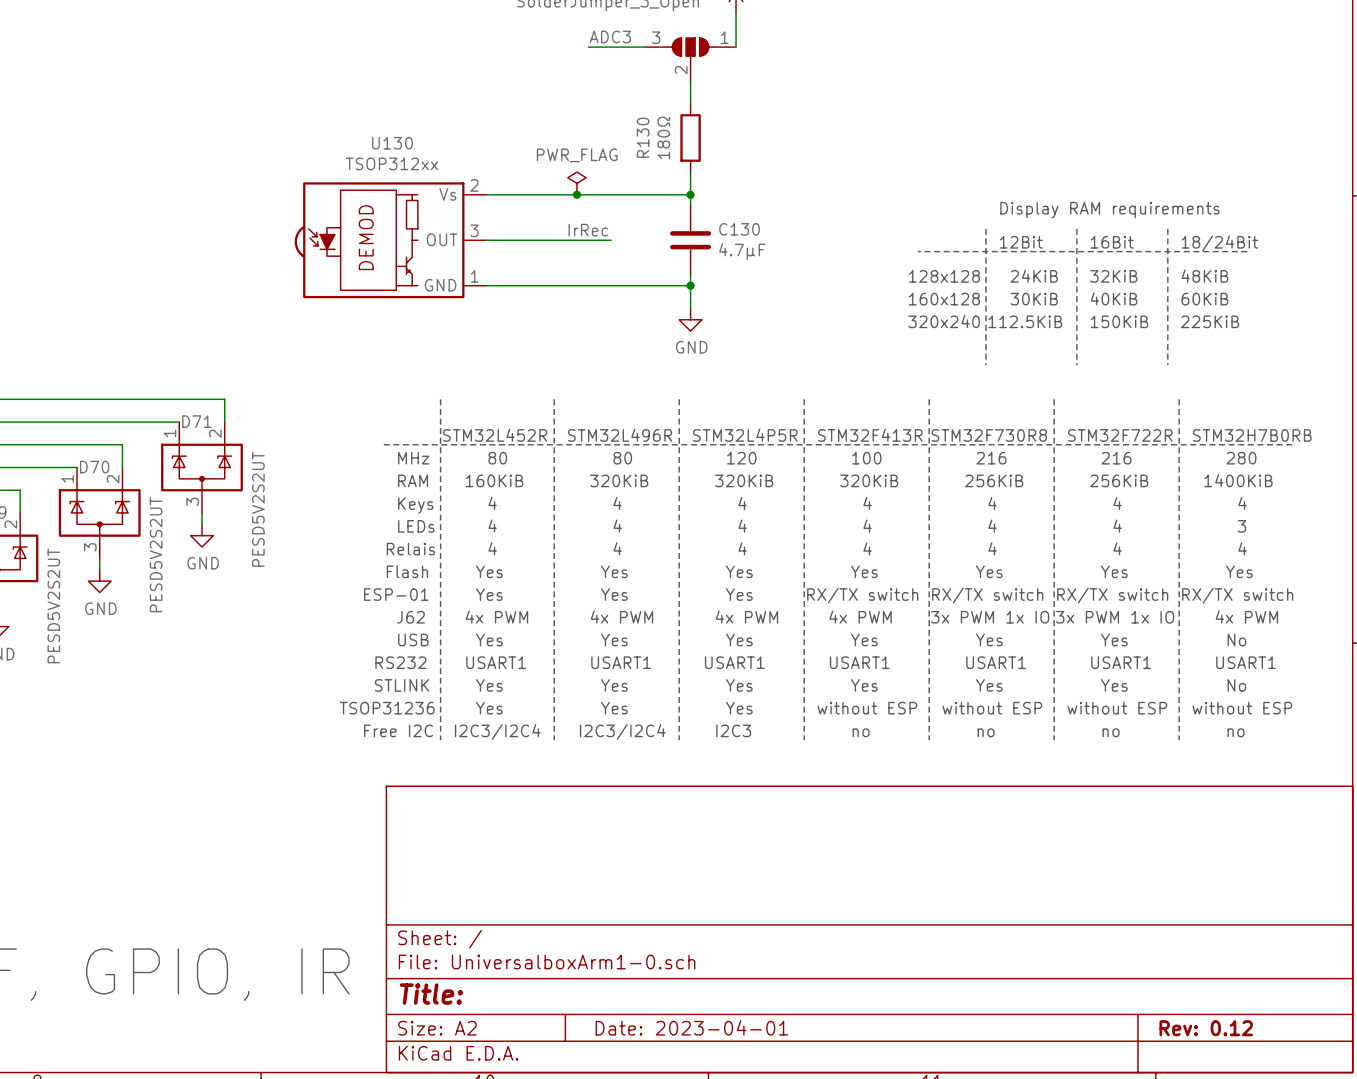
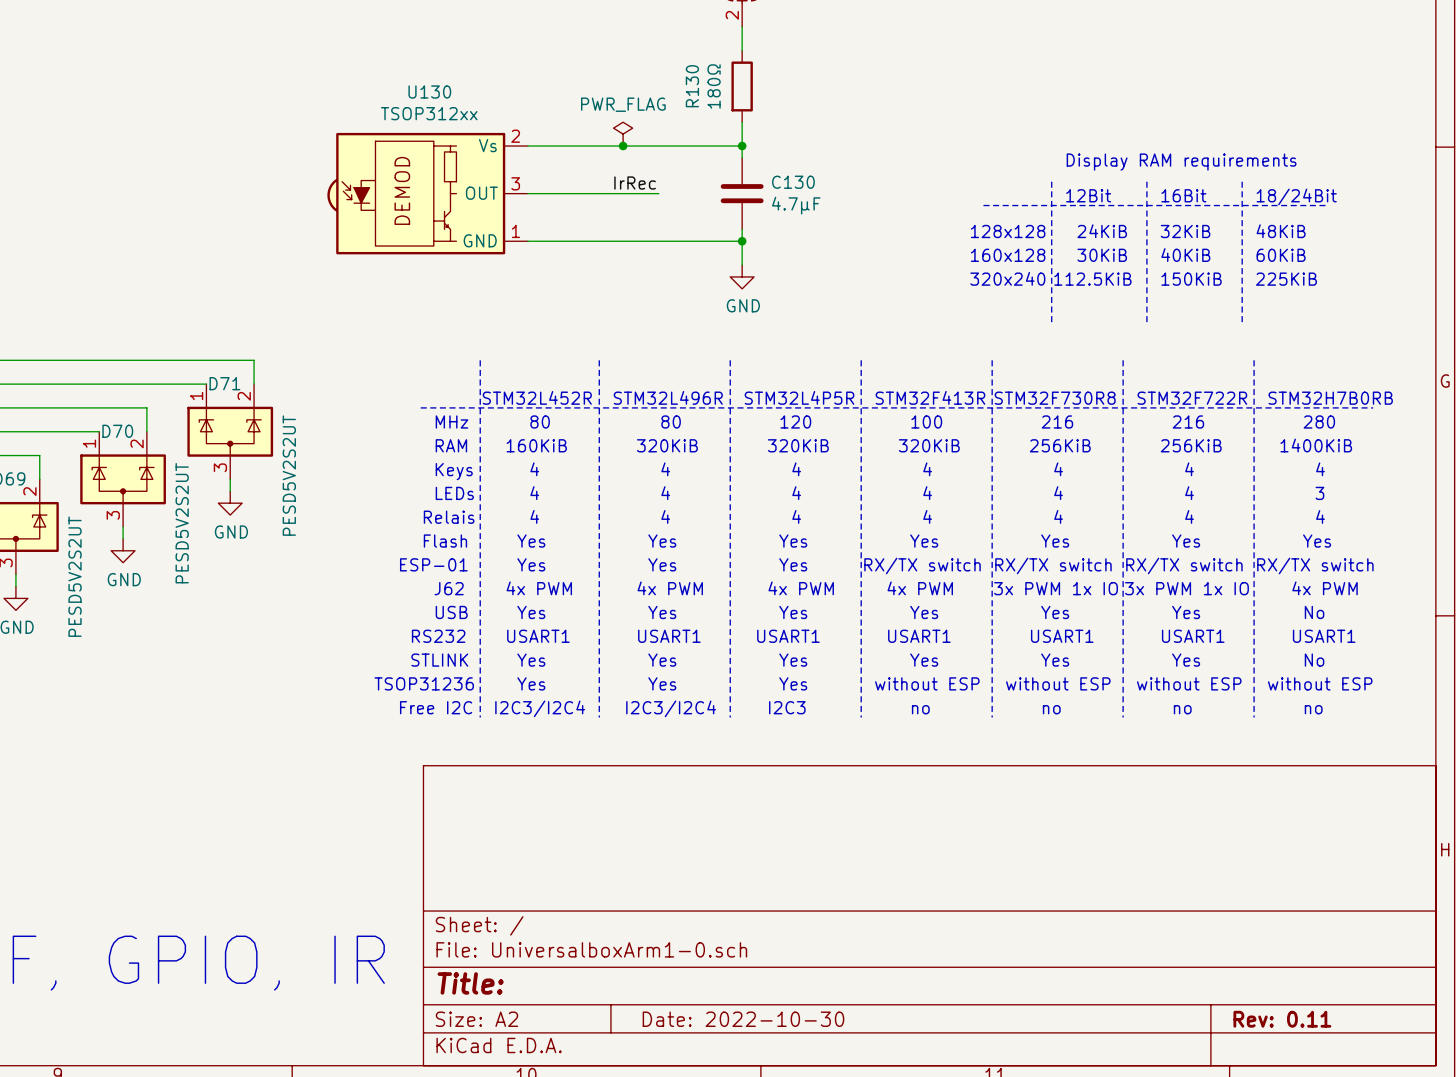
title block: Date: 2023-04-01 (691, 1027) -> Date: 2022-10-30 (743, 1019)
title block: Rev: 0.12 (1206, 1028) -> Rev: 0.11 (1282, 1019)

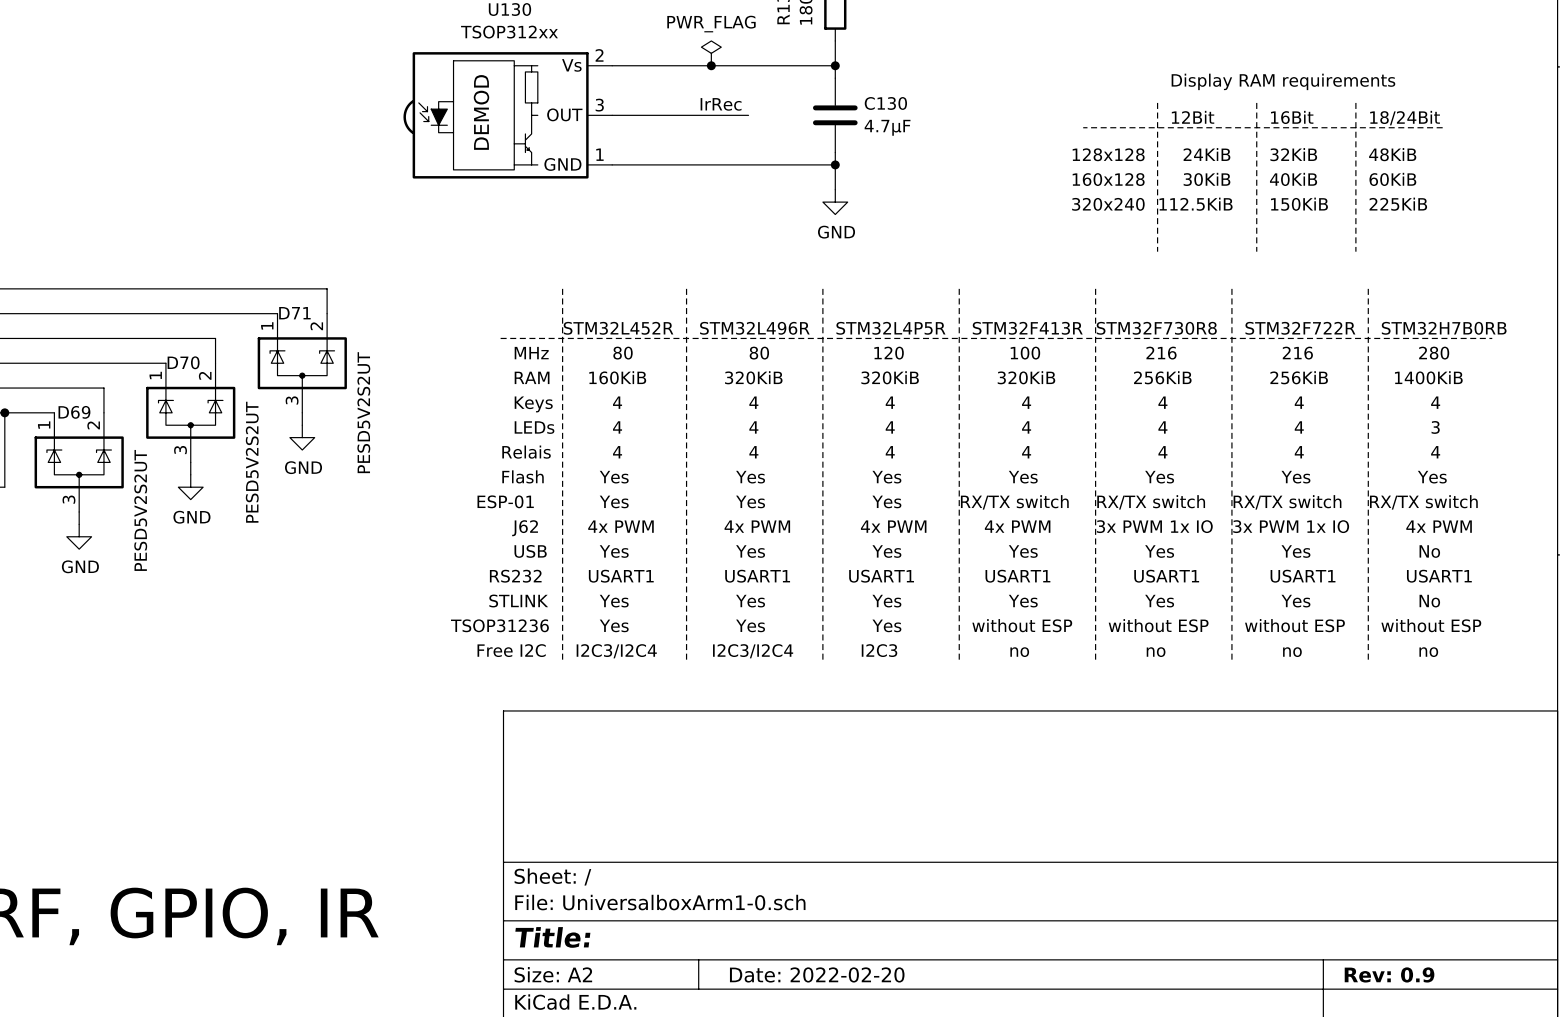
title block: Date: 2022-10-30 (743, 1019) -> Date: 2022-02-20 (817, 974)
title block: Rev: 0.11 (1282, 1019) -> Rev: 0.9 (1389, 974)

